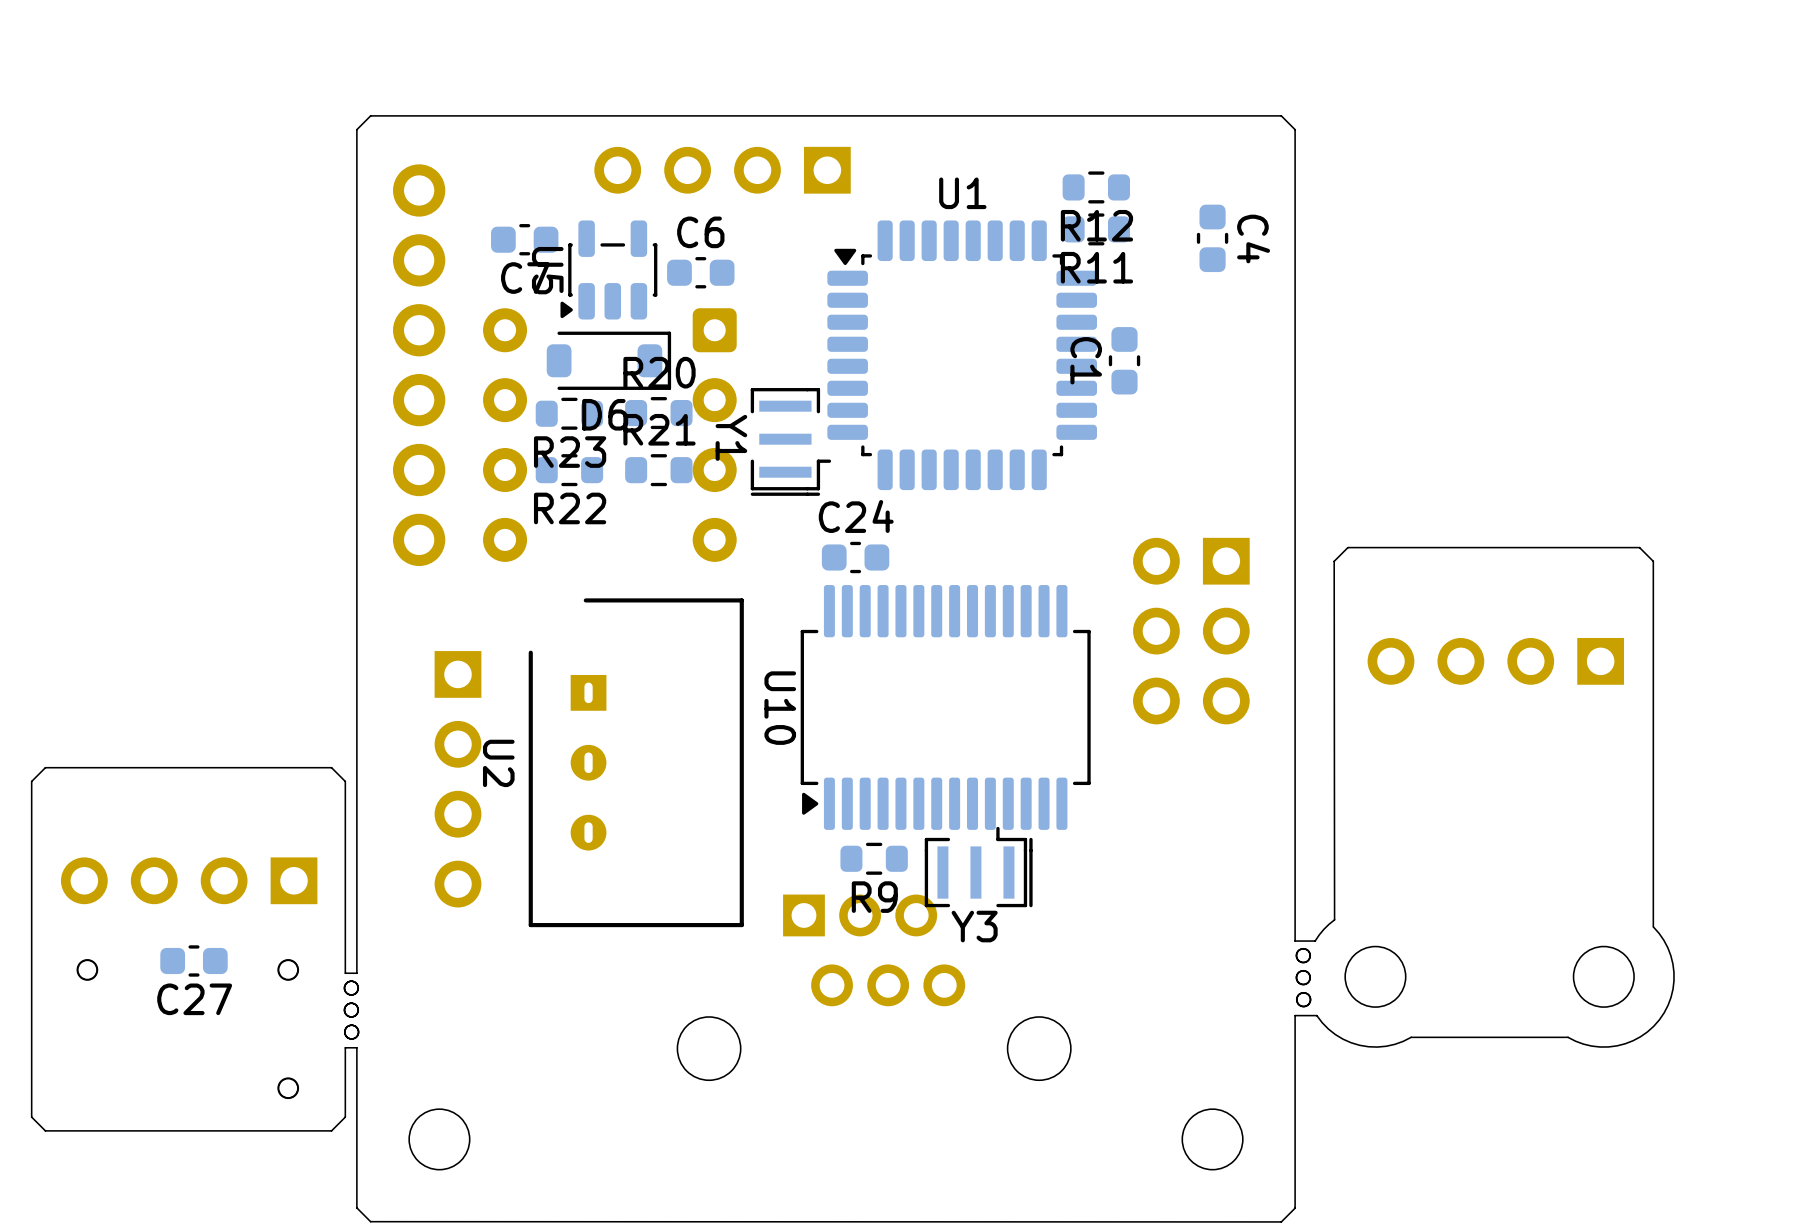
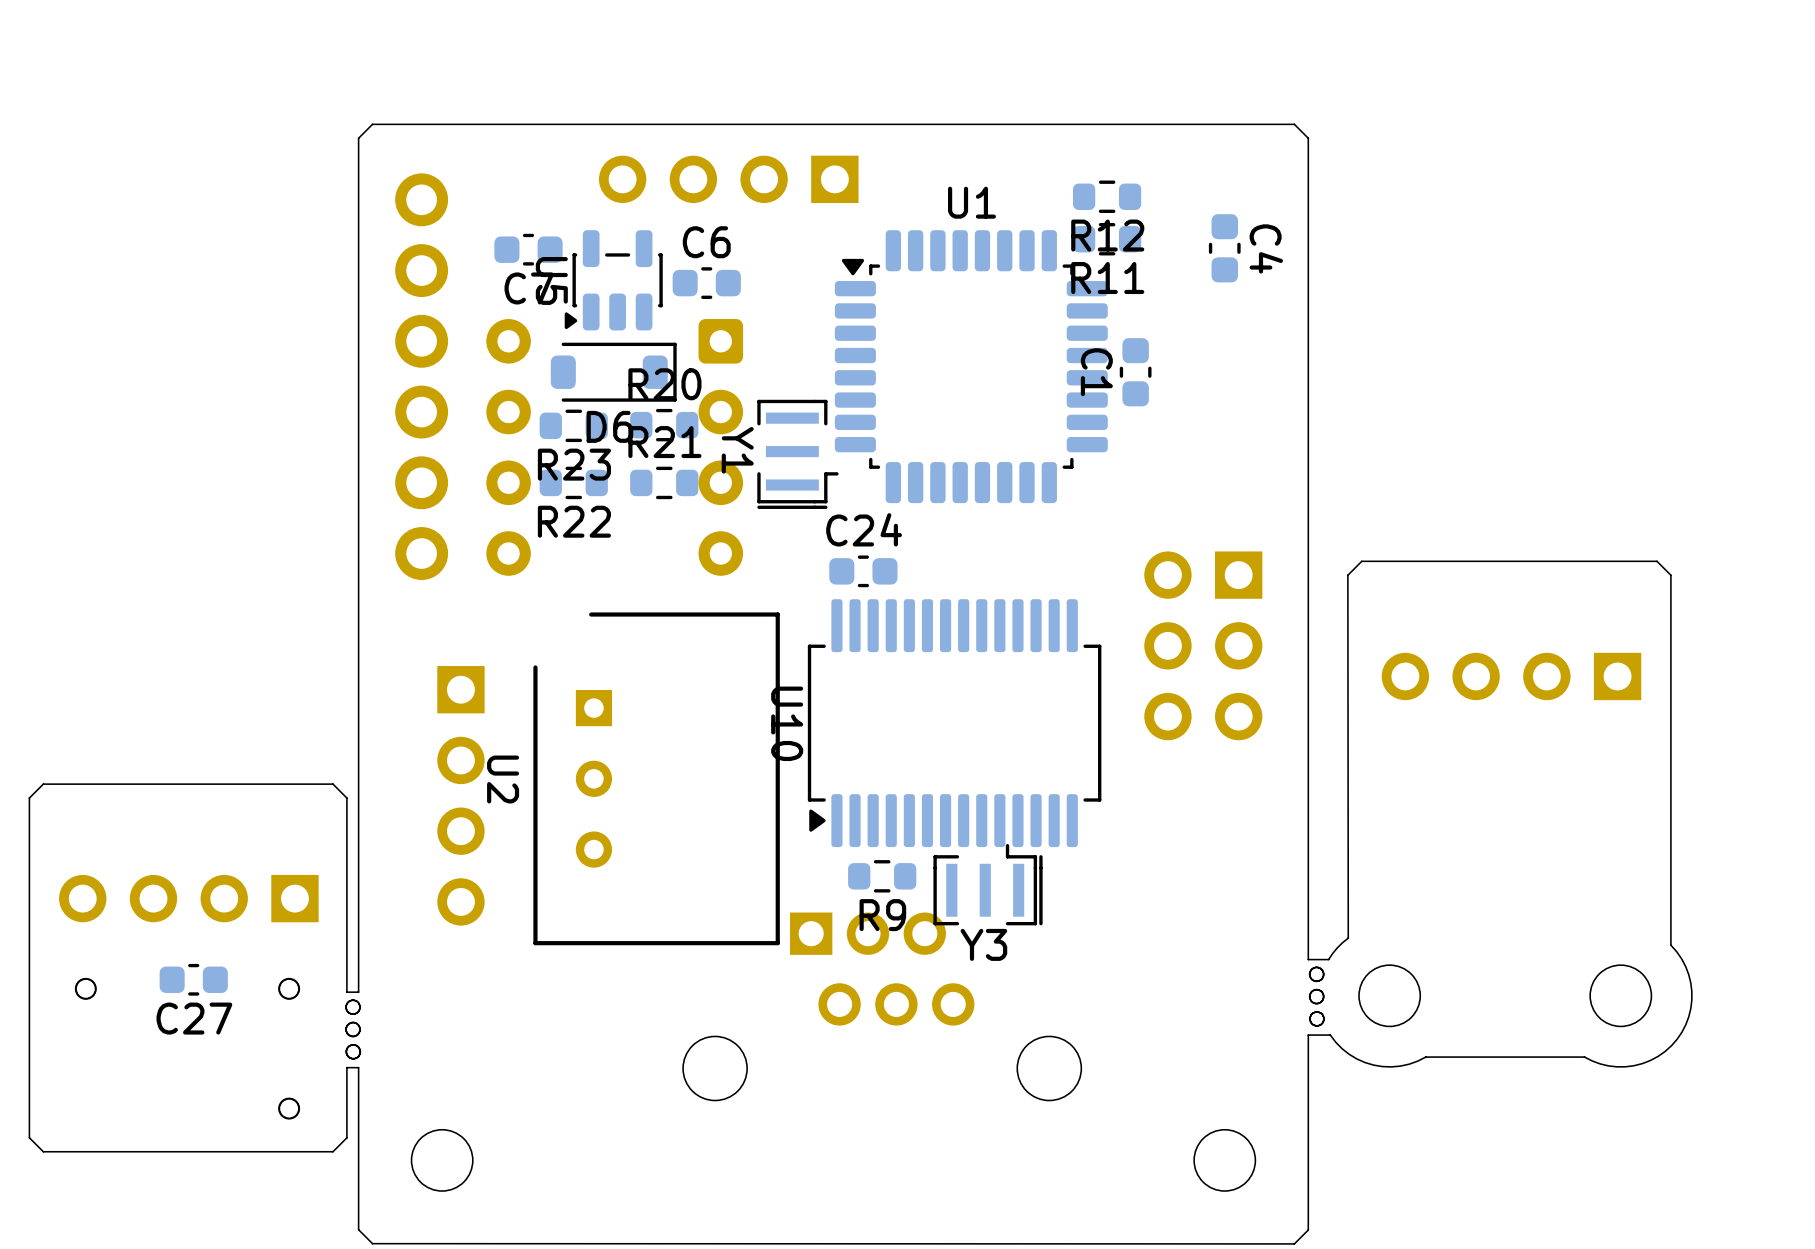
U2 footprint: [528, 598, 744, 928] -> [533, 612, 780, 946]

